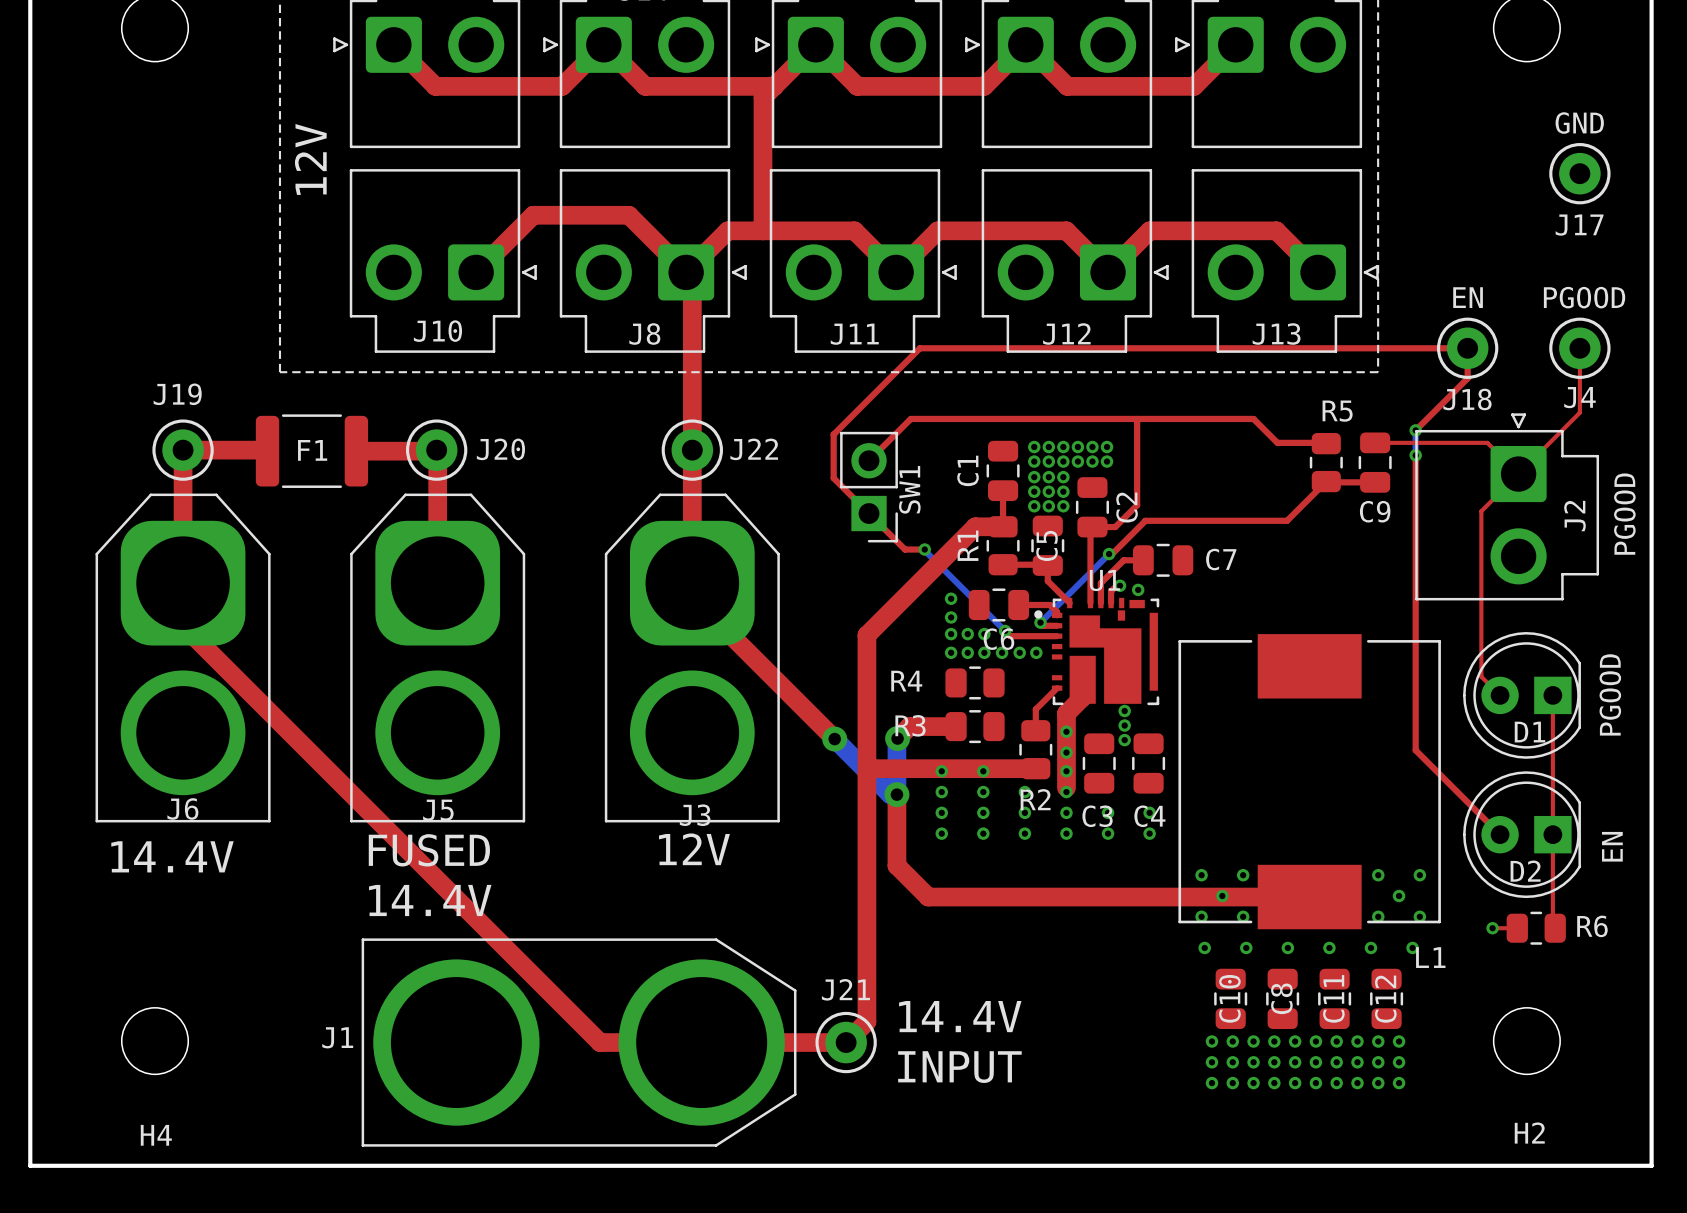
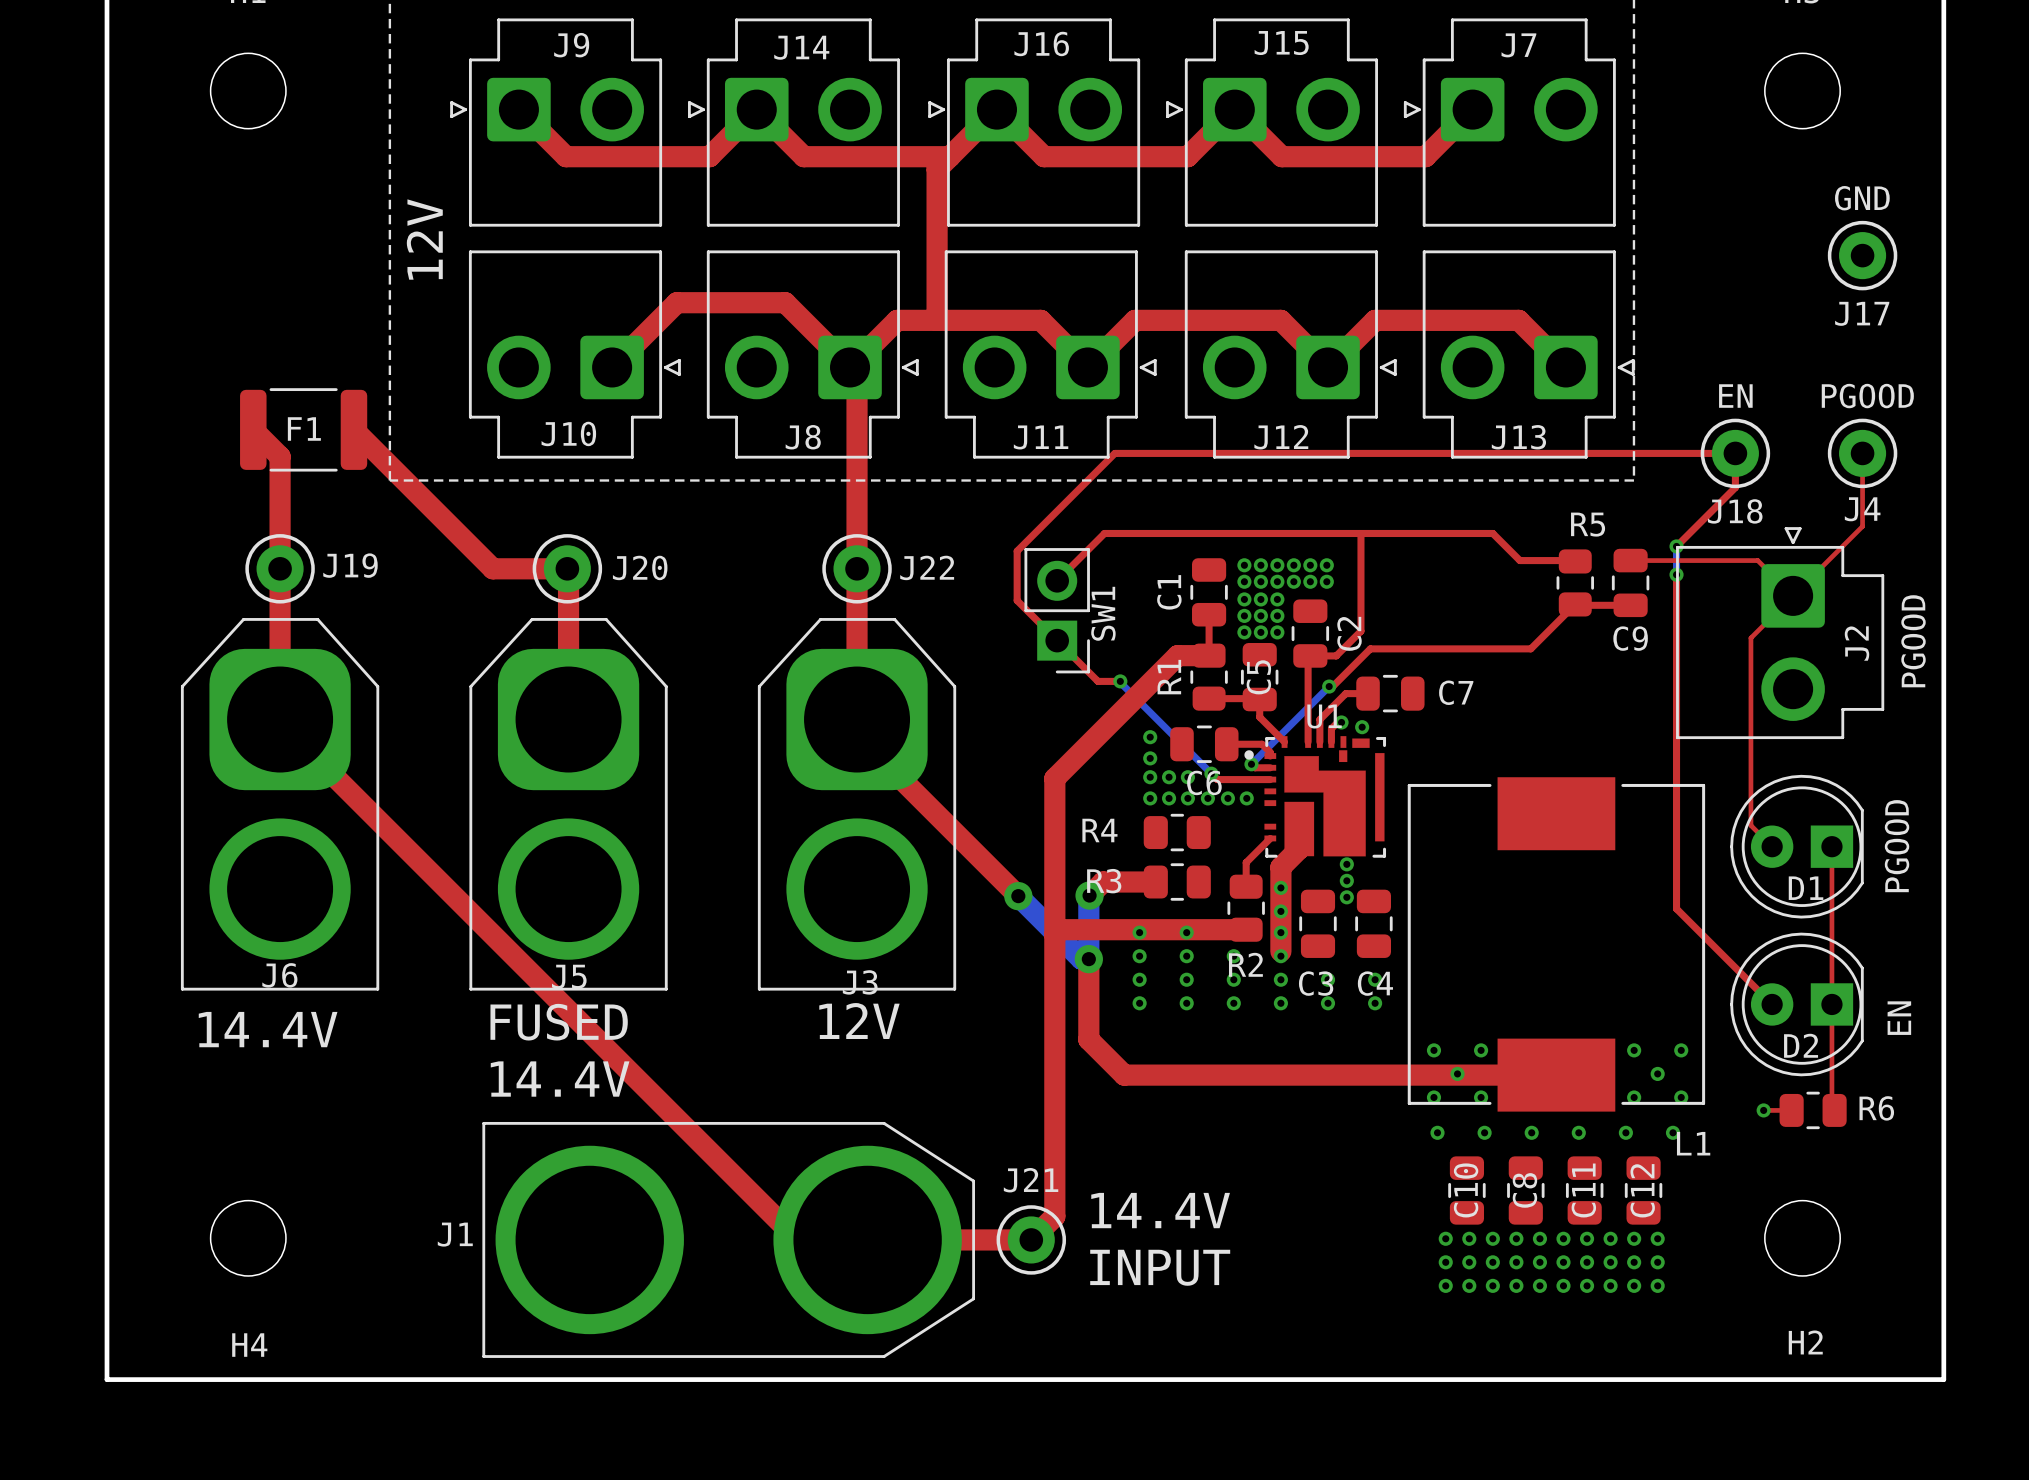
J19 name position: J19 (177, 394) -> J19 (350, 565)
top track: (183, 450) (267, 451) -> (280, 568) (280, 456) (253, 429)
top track: (436, 450) (356, 451) -> (567, 568) (492, 568) (353, 429)
F1 position: (311, 451) -> (303, 429)
top track: (183, 583) (183, 625) (600, 1042) (701, 1042) -> none
top track: none -> (280, 722) (797, 1239)

